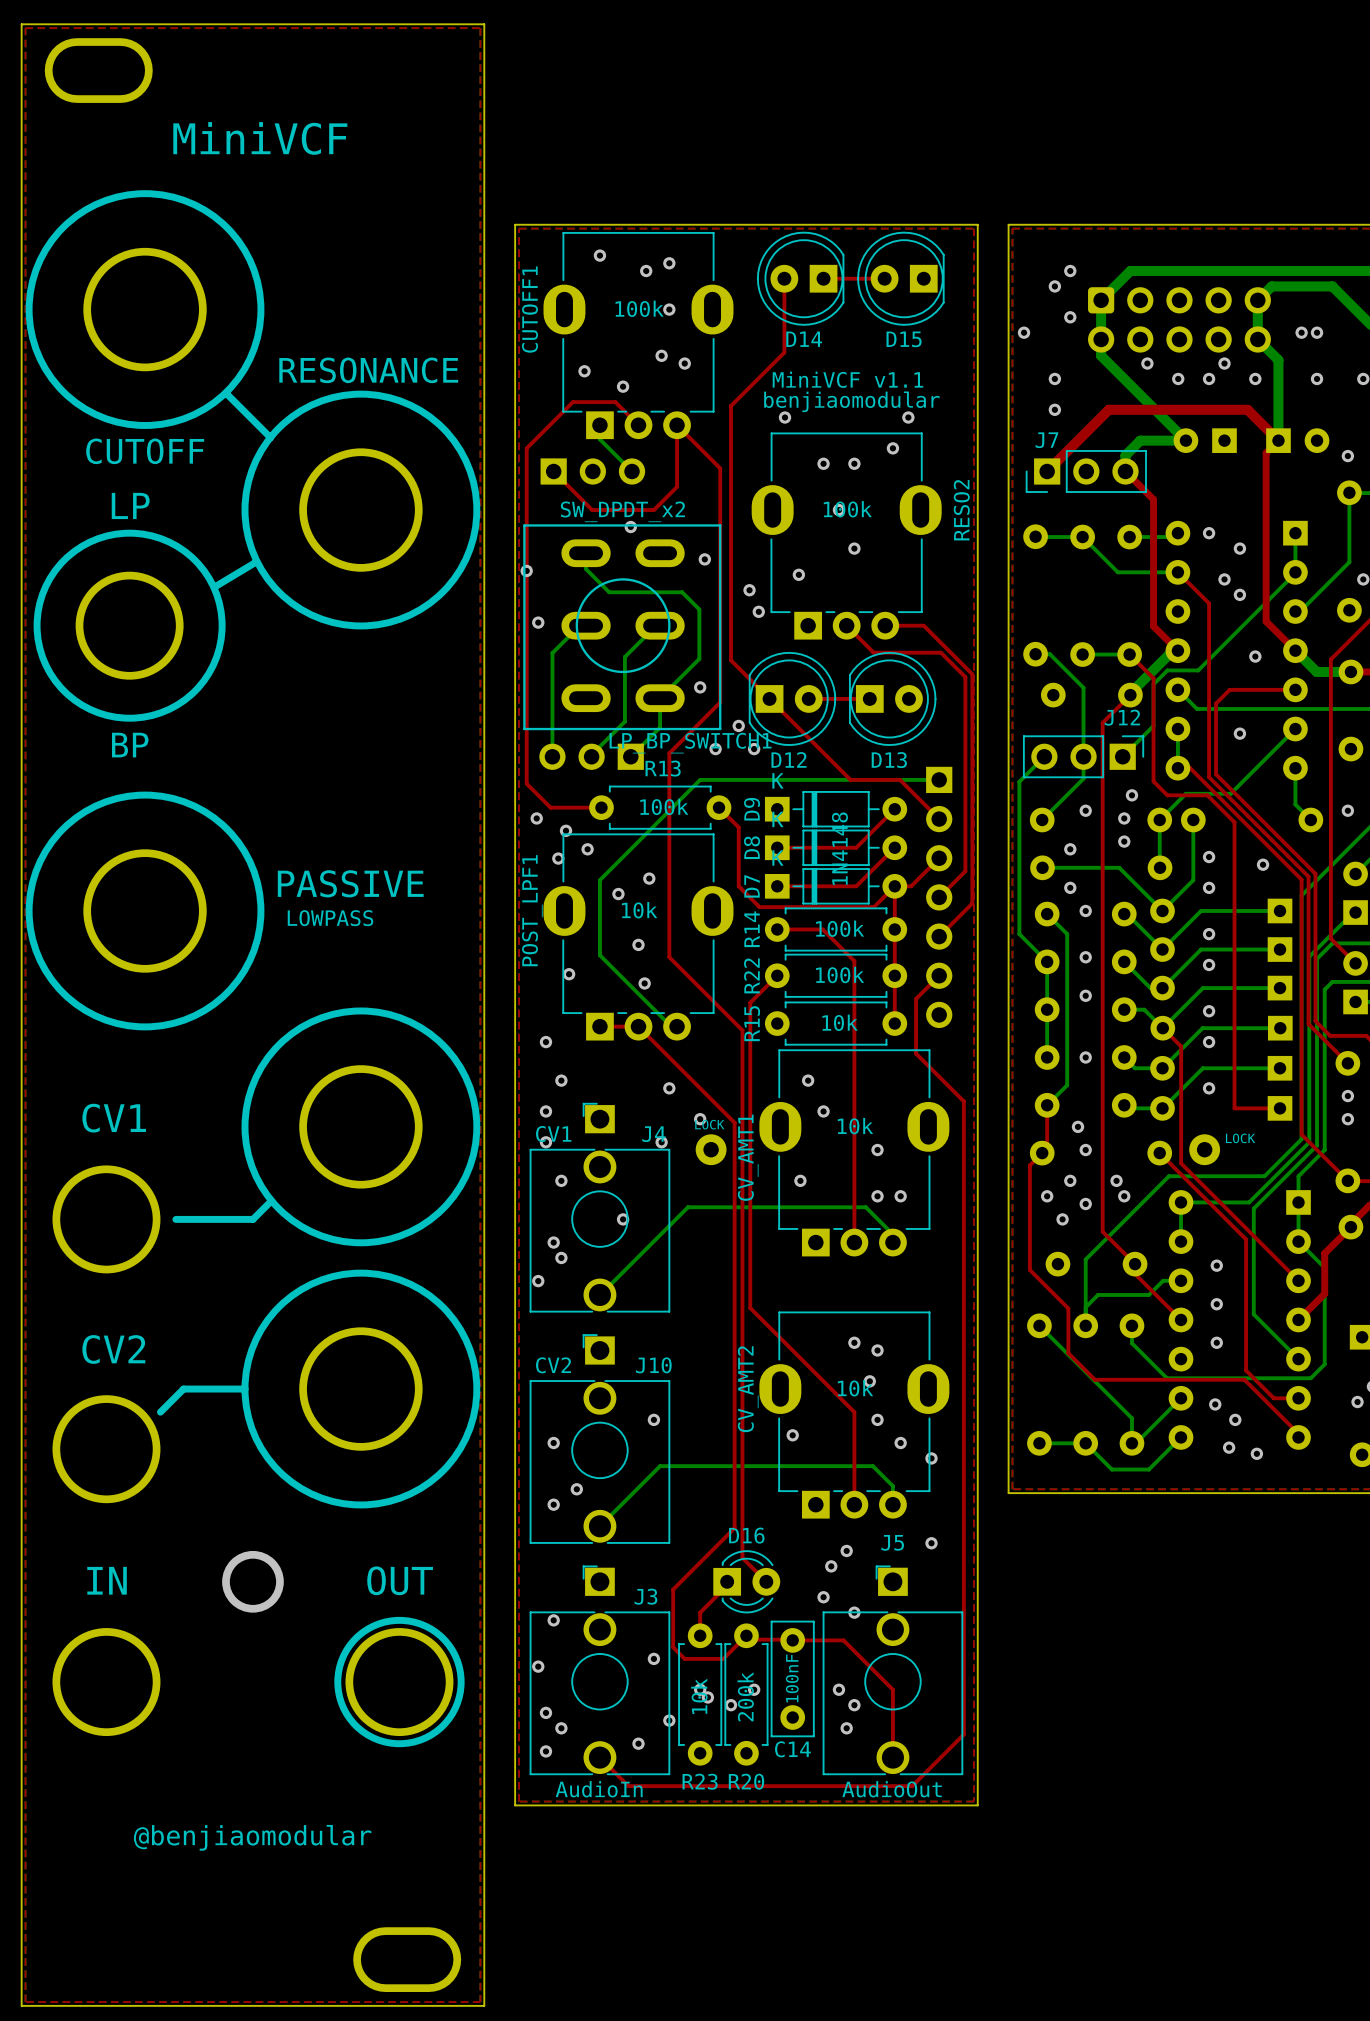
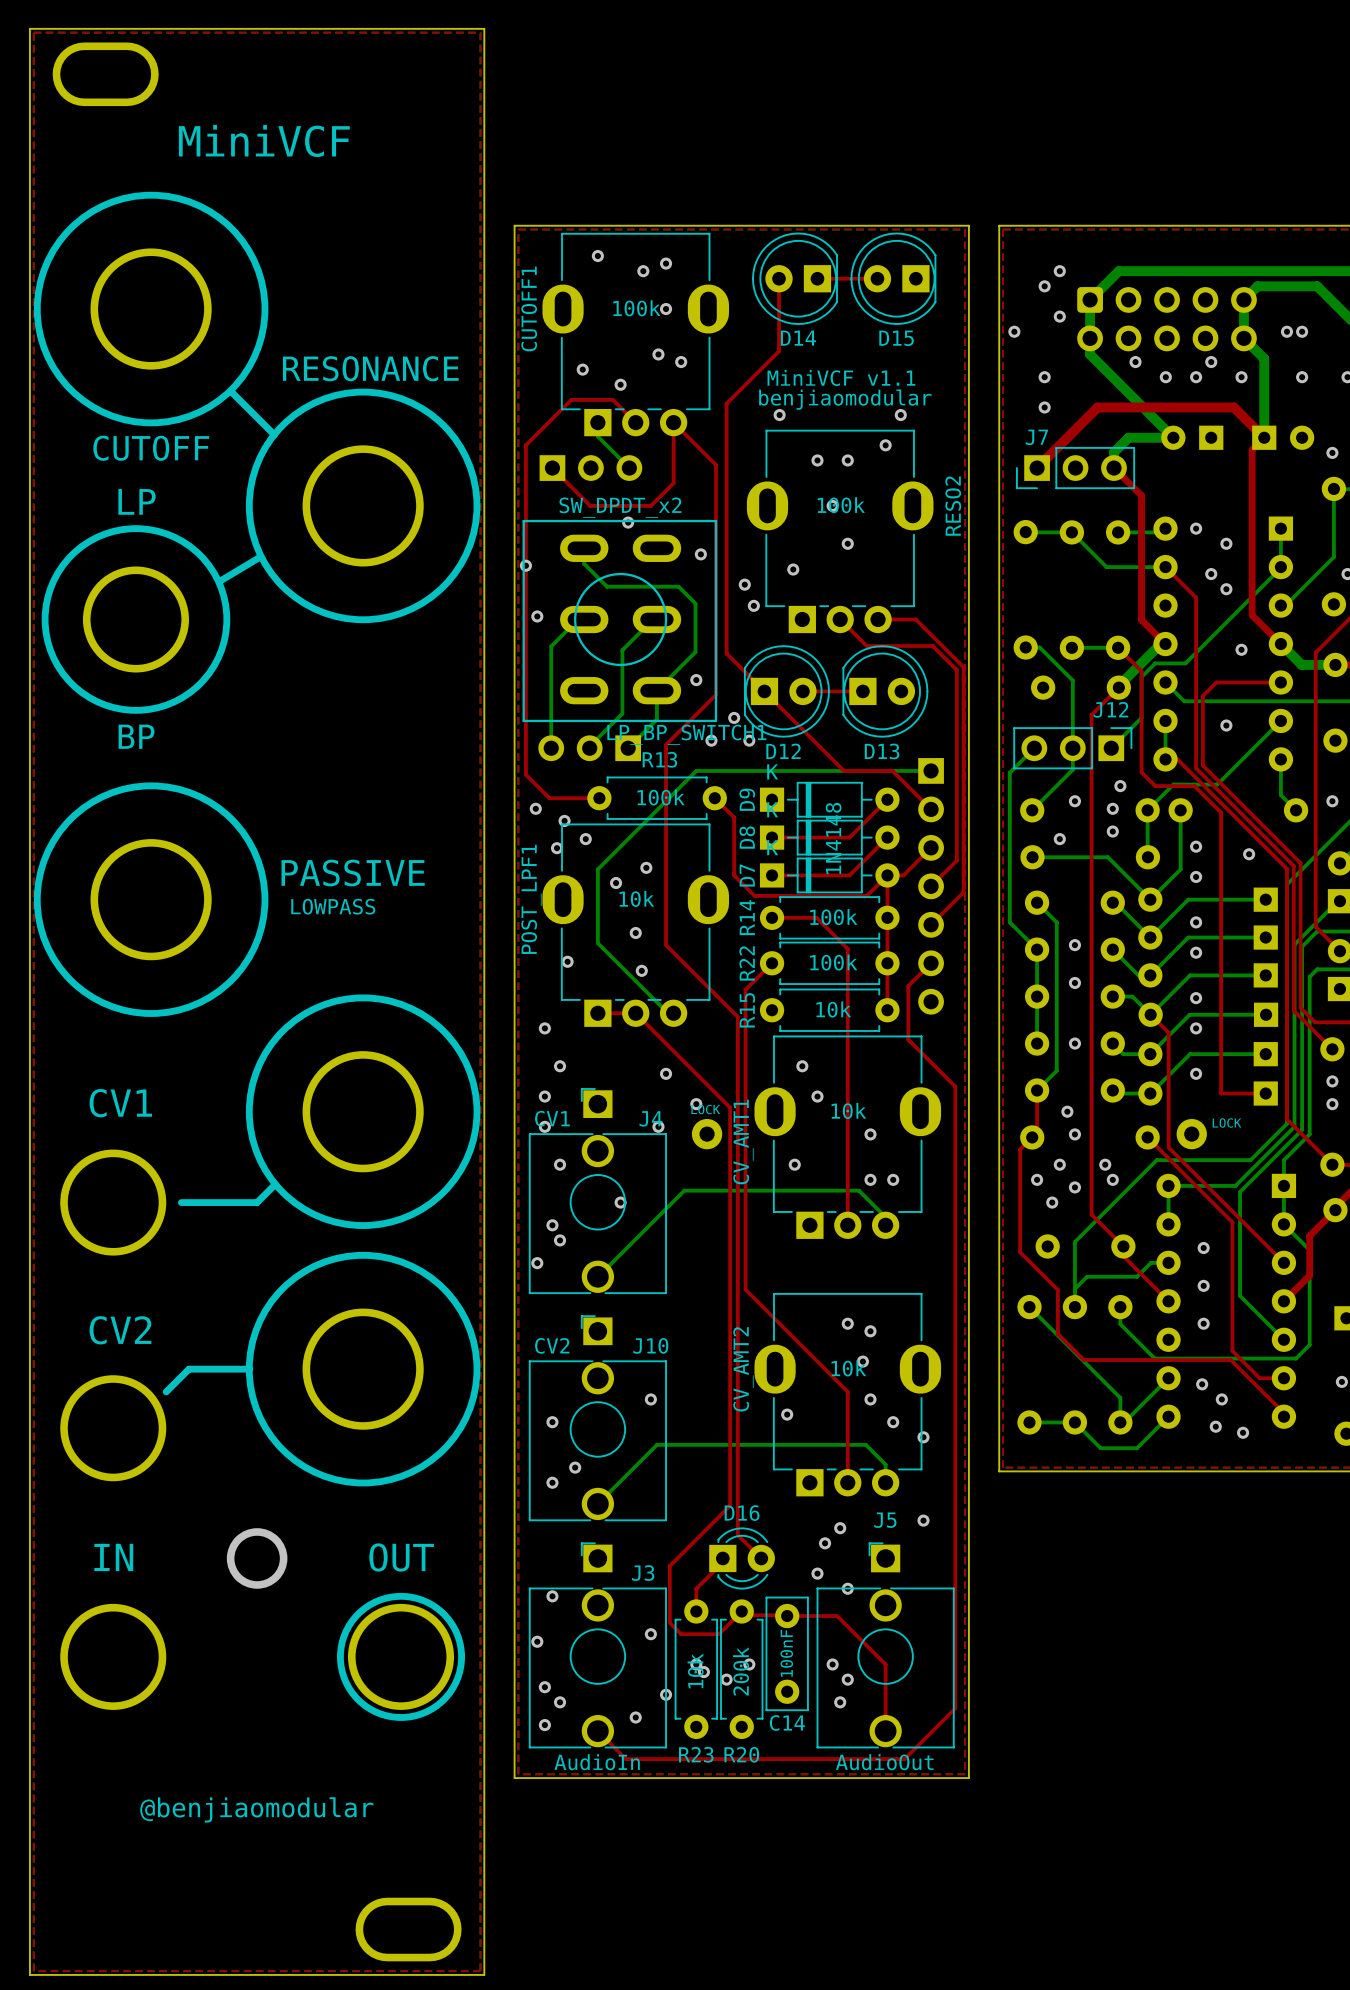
via: (1070, 887) -> none
via: (1085, 910) -> none

